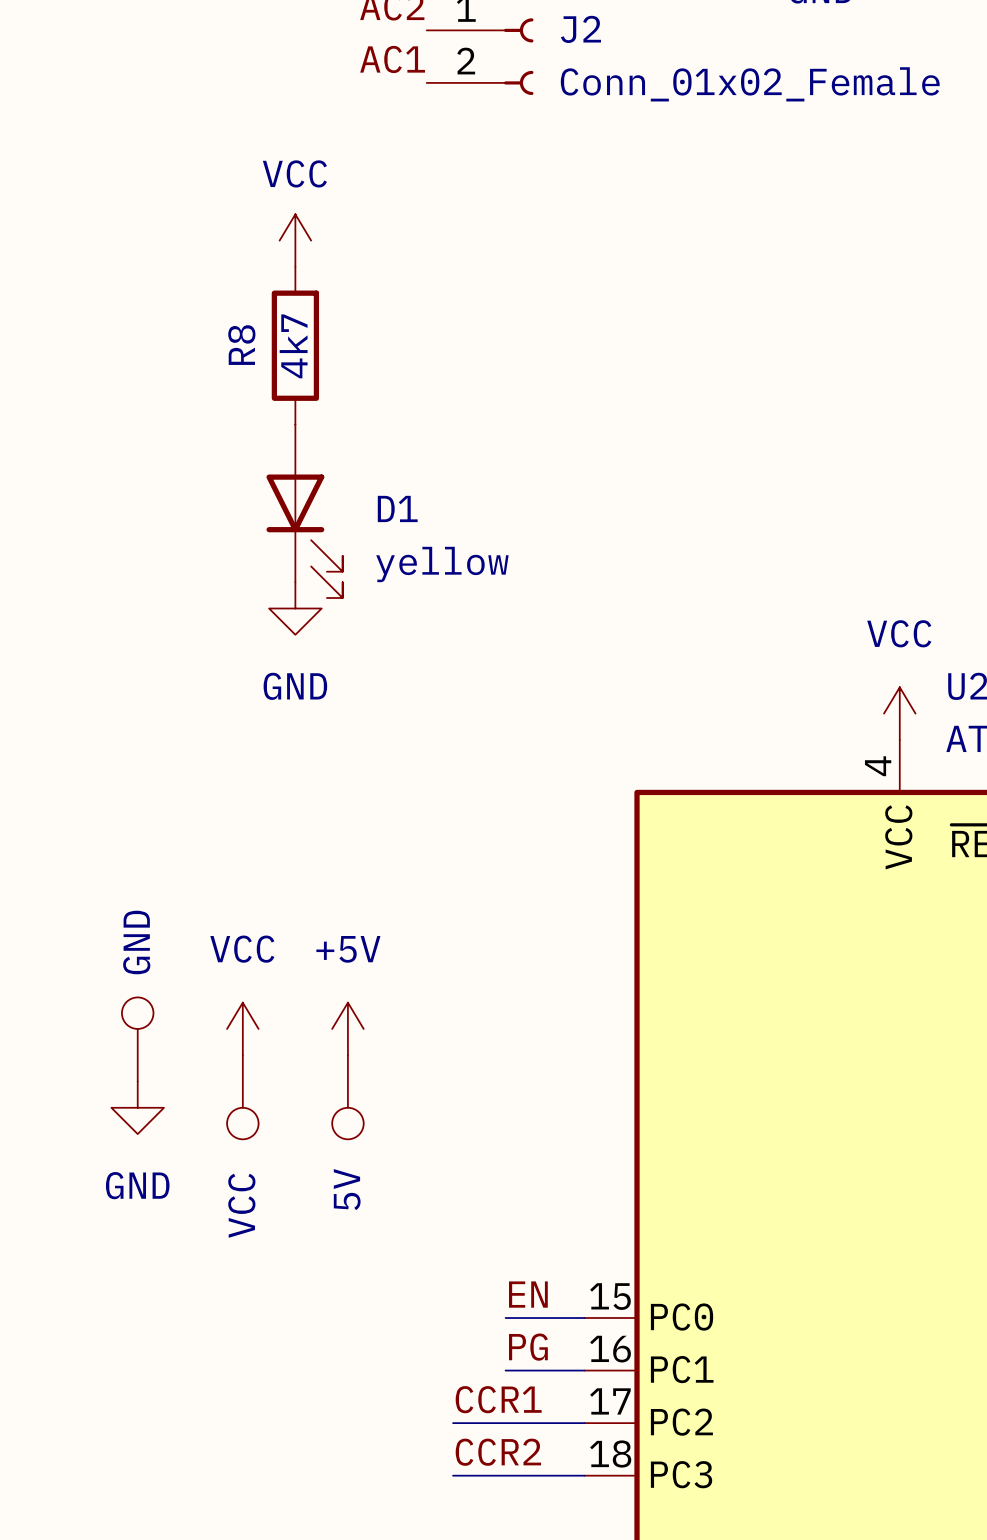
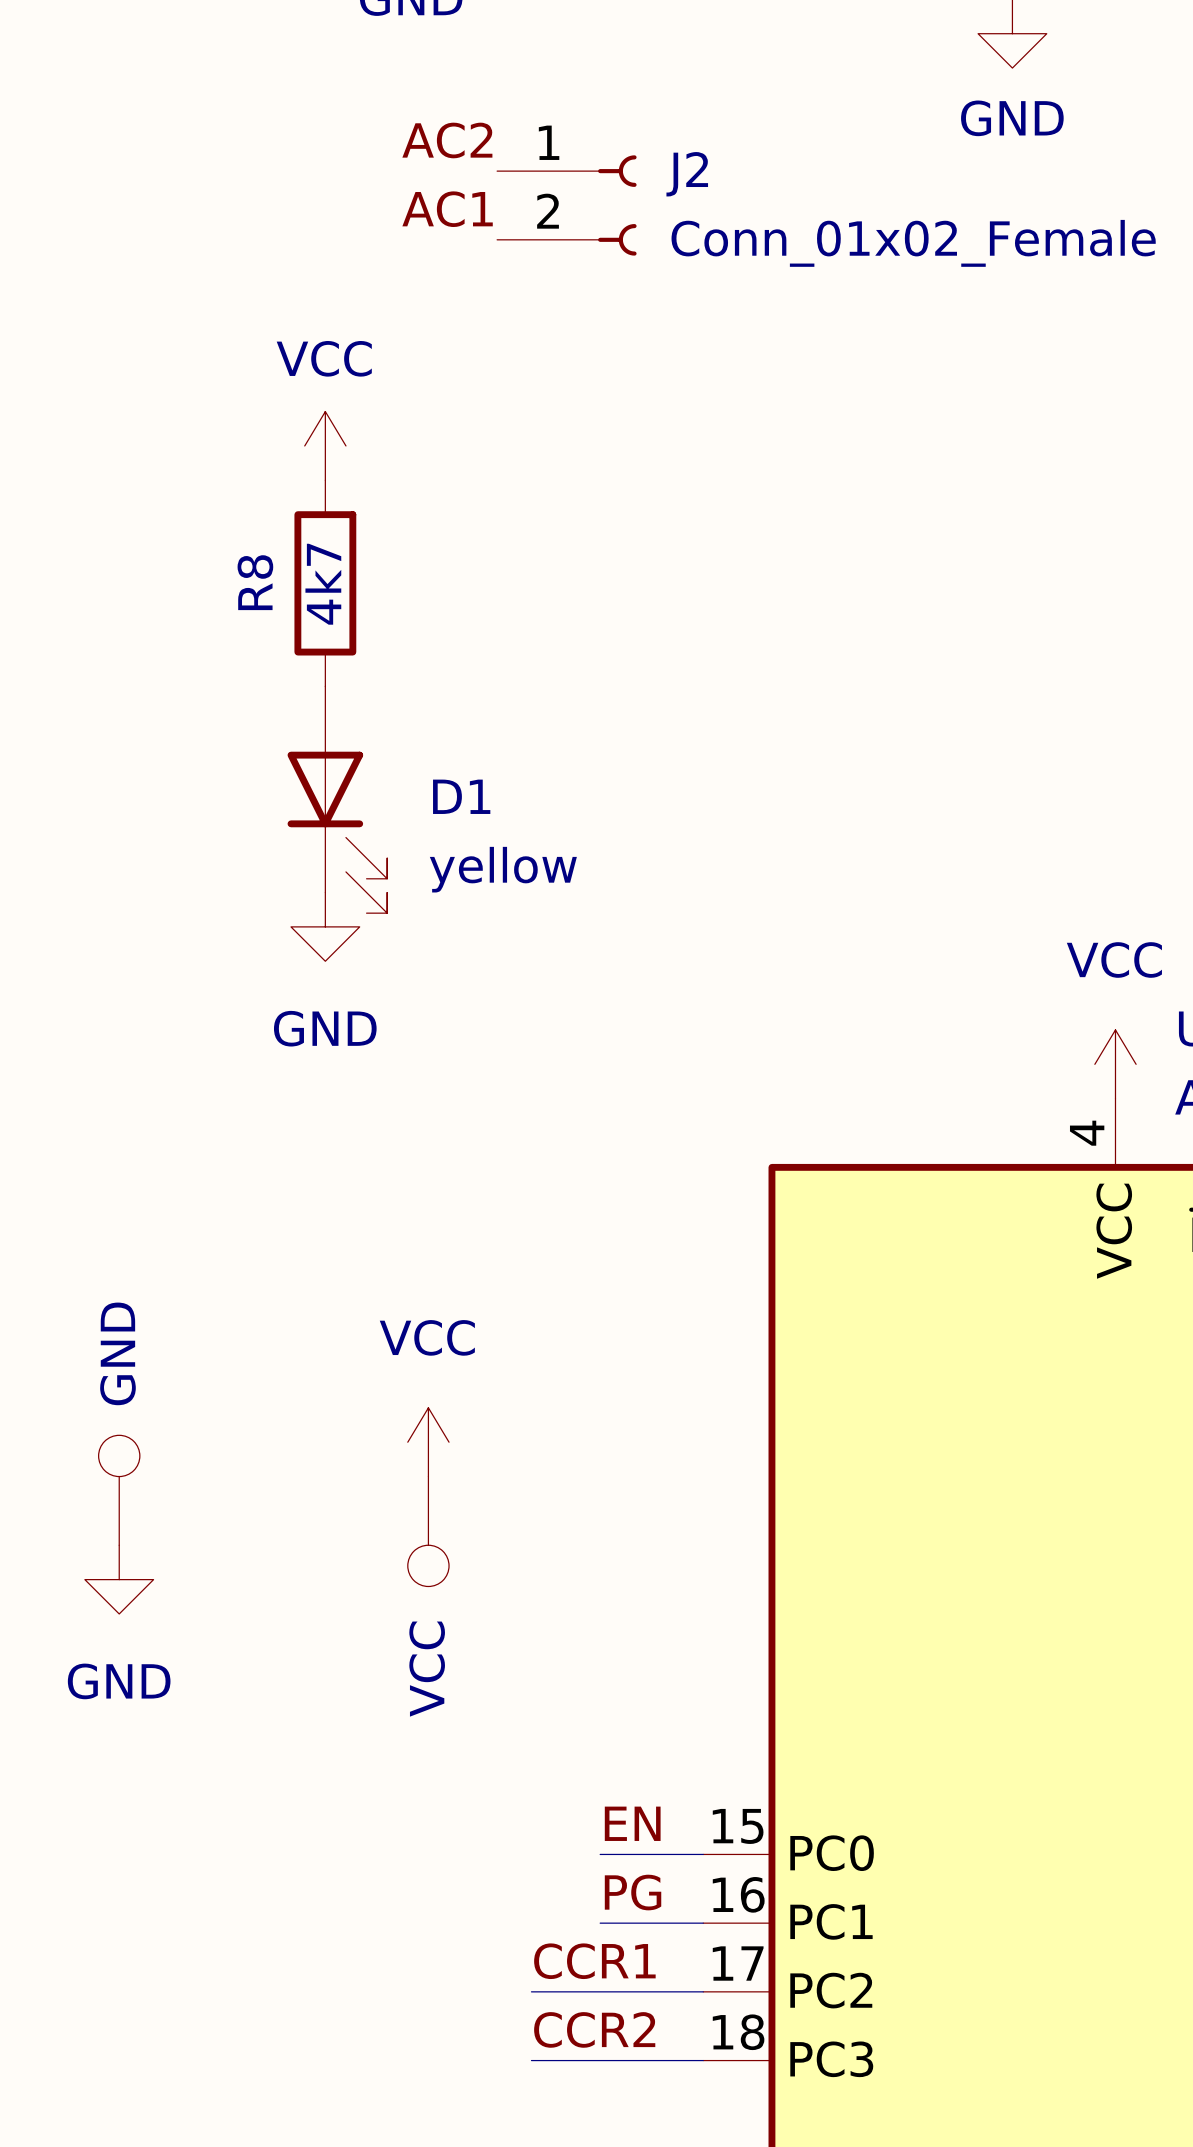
power symbol position: VCC (242, 1028) -> VCC (428, 1442)
power symbol: +5V (347, 1028) -> none
part position: (242, 1097) -> (428, 1531)
part: 5V (347, 1097) -> none

